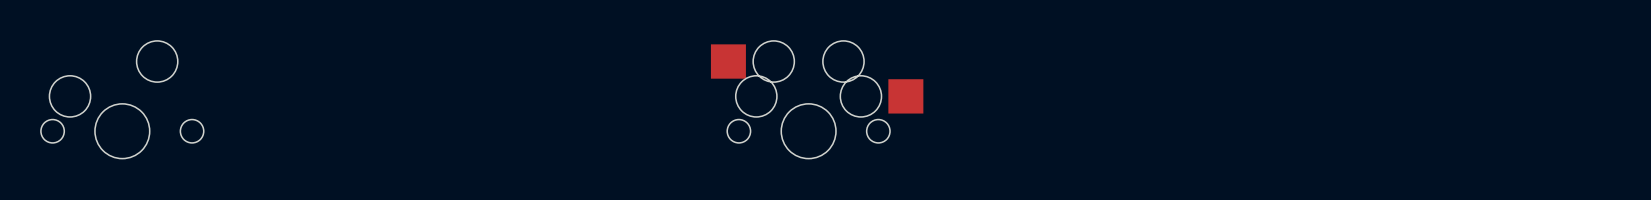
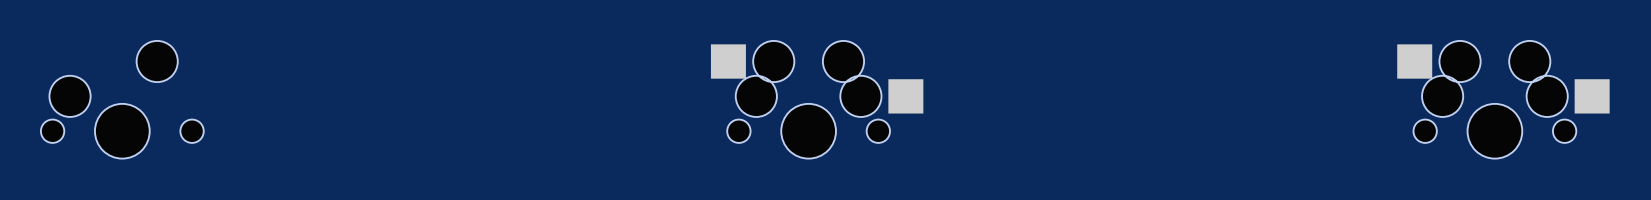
part: none -> (1503, 99)

